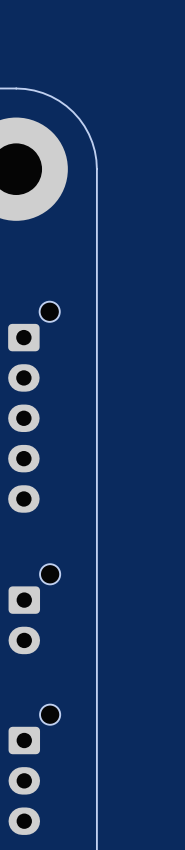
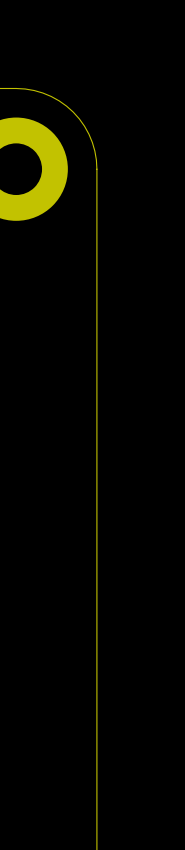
part: (33, 407) -> none
part: (34, 609) -> none
part: (34, 769) -> none

